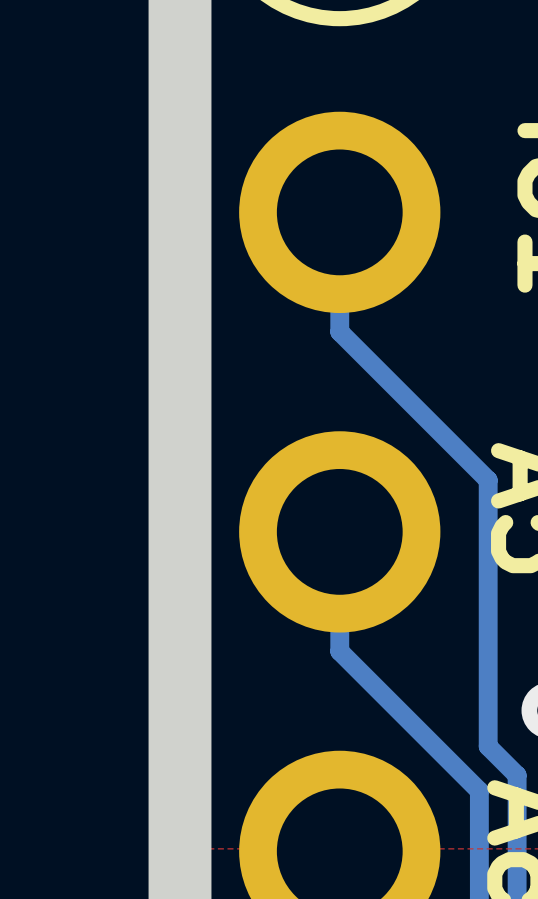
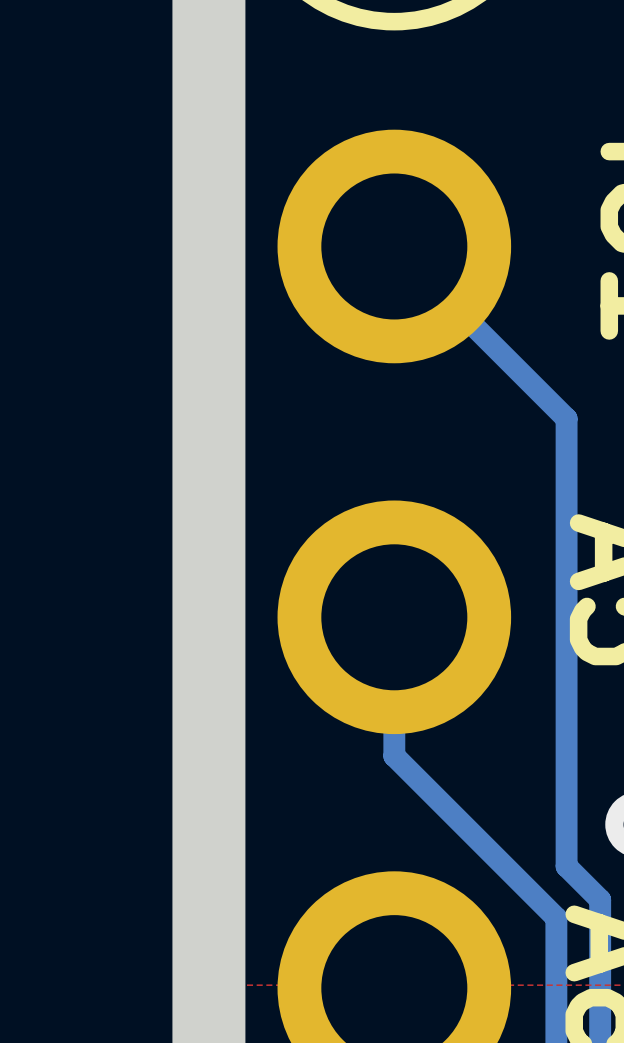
bottom track: (339, 212) (339, 331) (488, 480) -> (394, 246) (566, 418) (566, 557)

